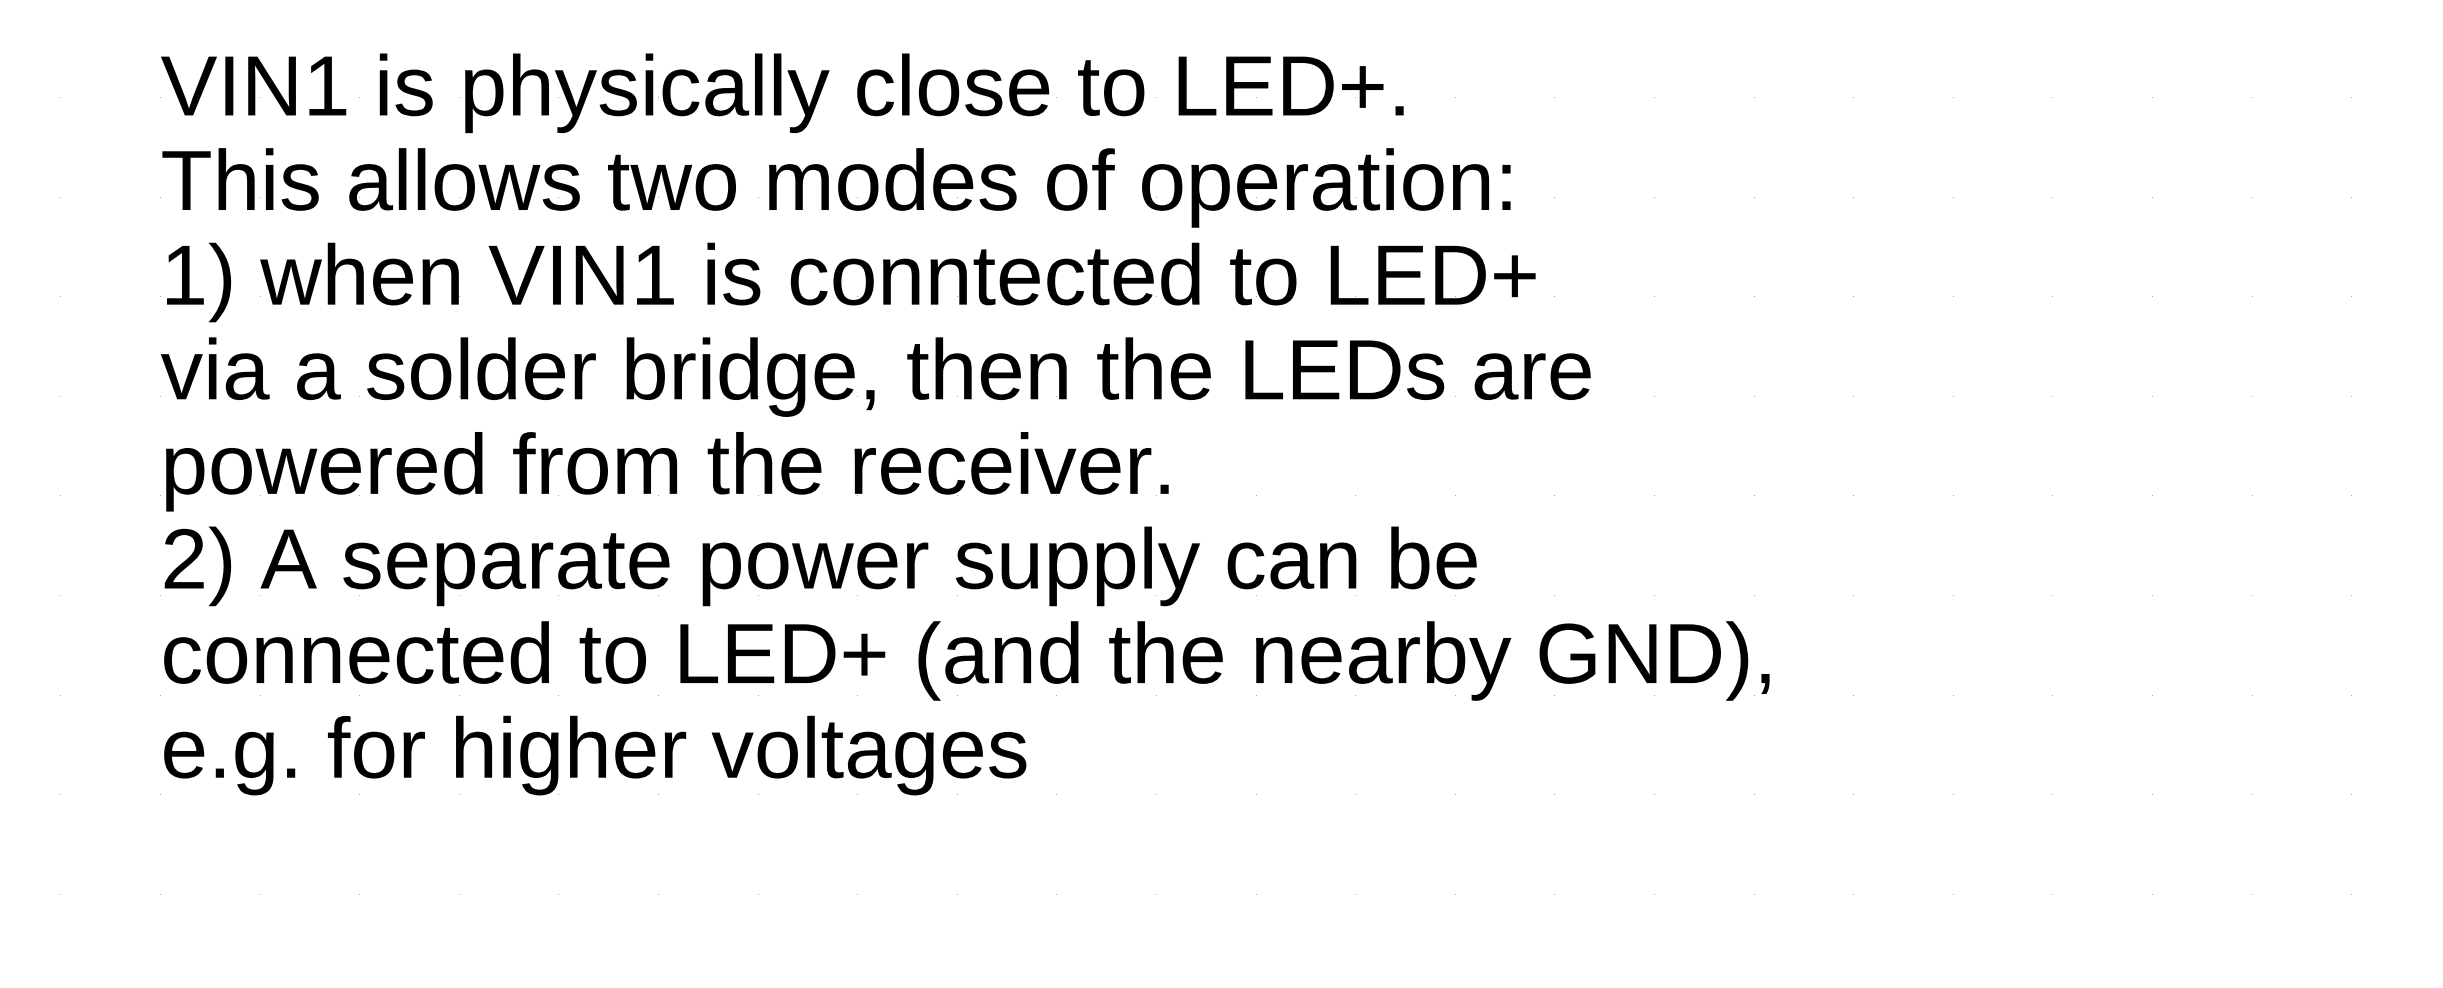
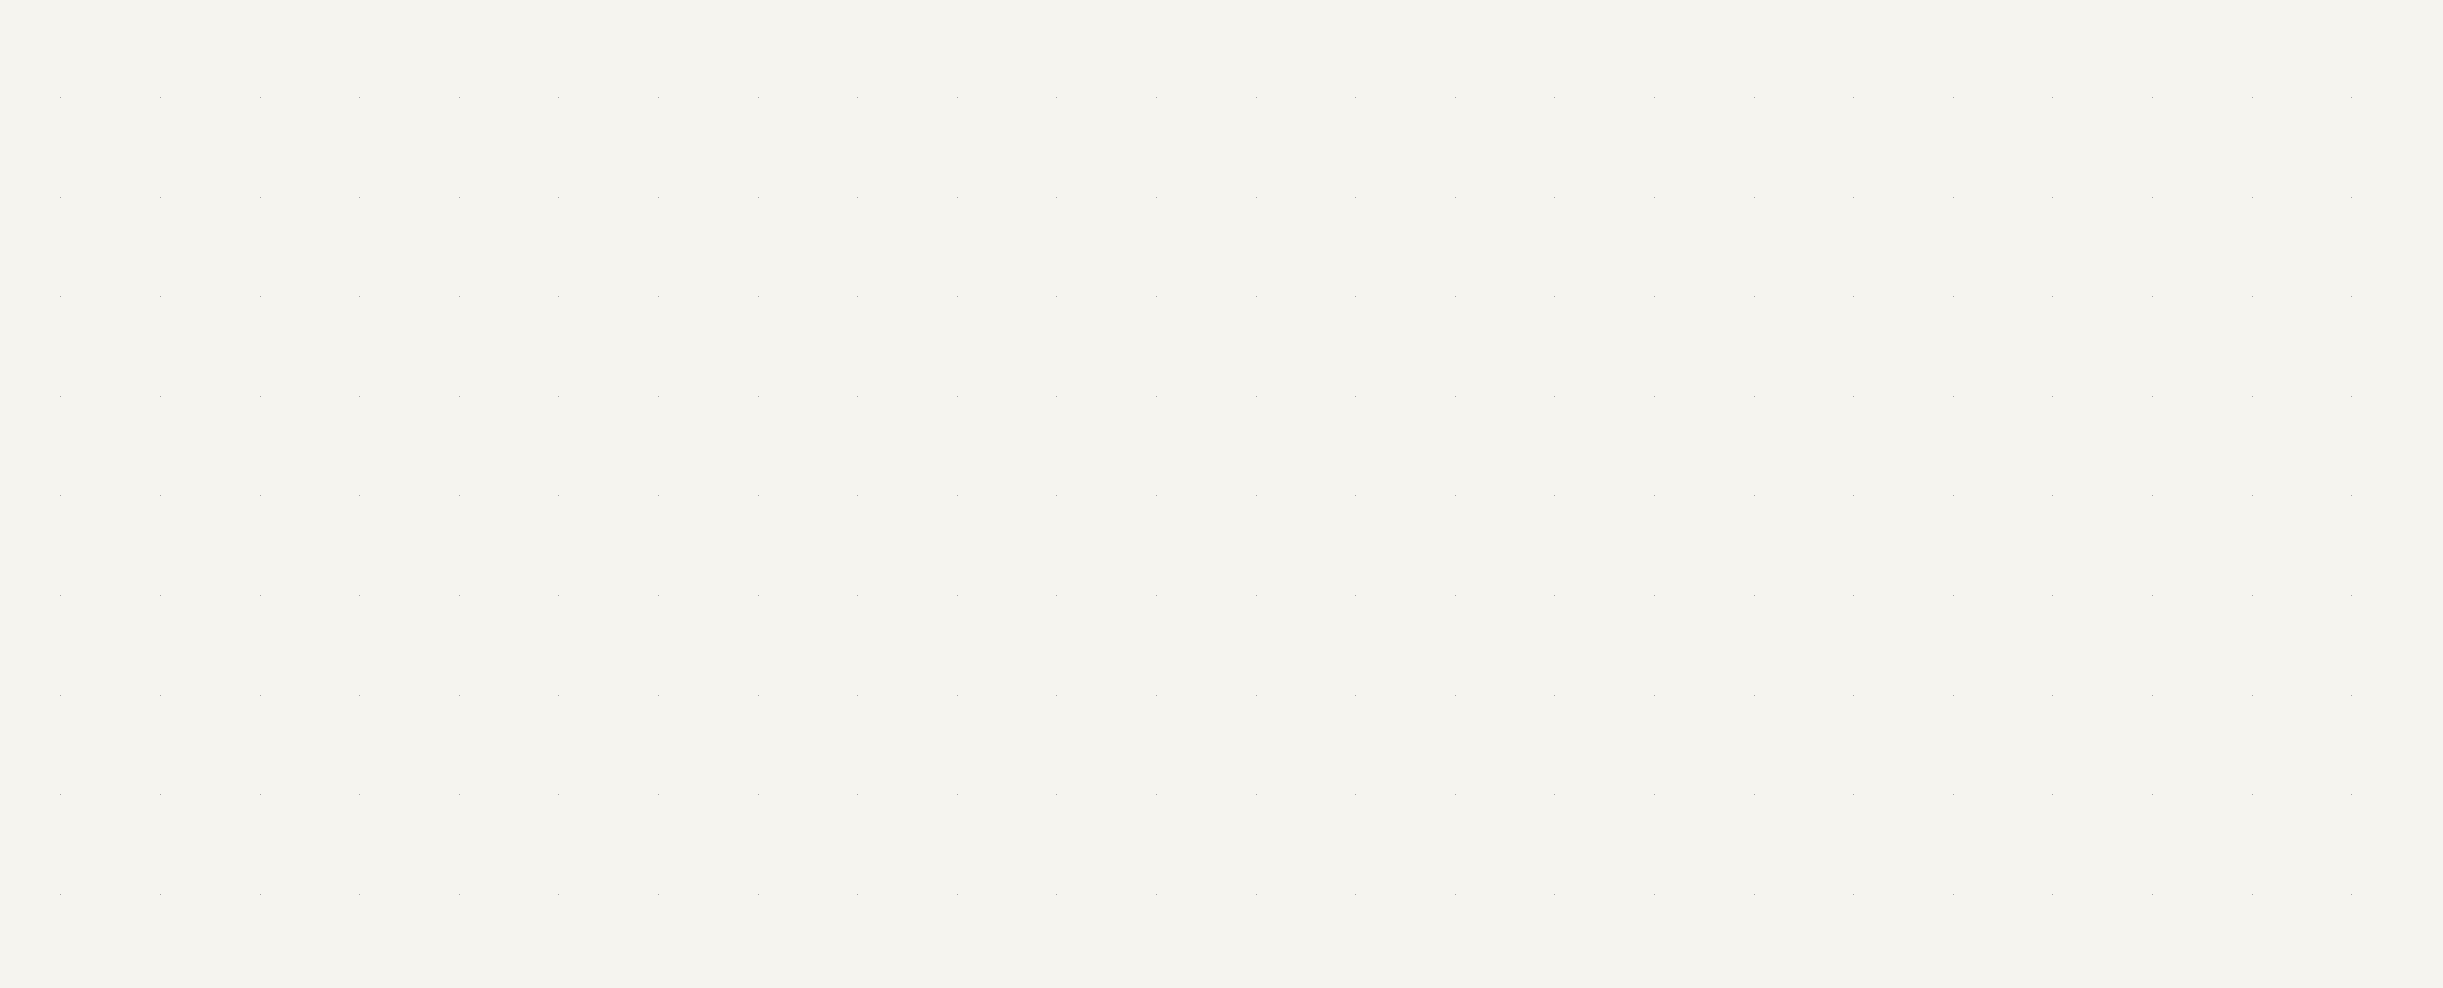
text: VIN1 is physically close to LED+. (782, 93) -> none
text: This allows two modes of operation: (836, 187) -> none
text: 1) when VIN1 is conntected to LED+ (851, 282) -> none
text: via a solder bridge, then the LEDs are (875, 377) -> none
text: powered from the receiver. (667, 471) -> none
text: 2) A separate power supply can be (820, 566) -> none
text: connected to LED+ (and the nearby GND), (966, 661) -> none
text: e.g. for higher voltages (595, 755) -> none

